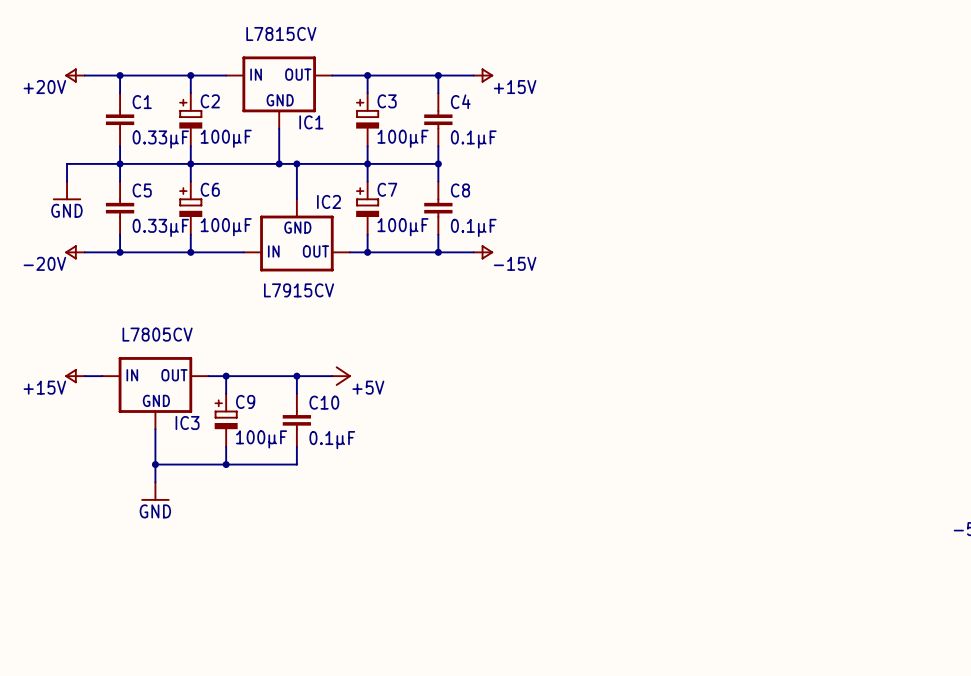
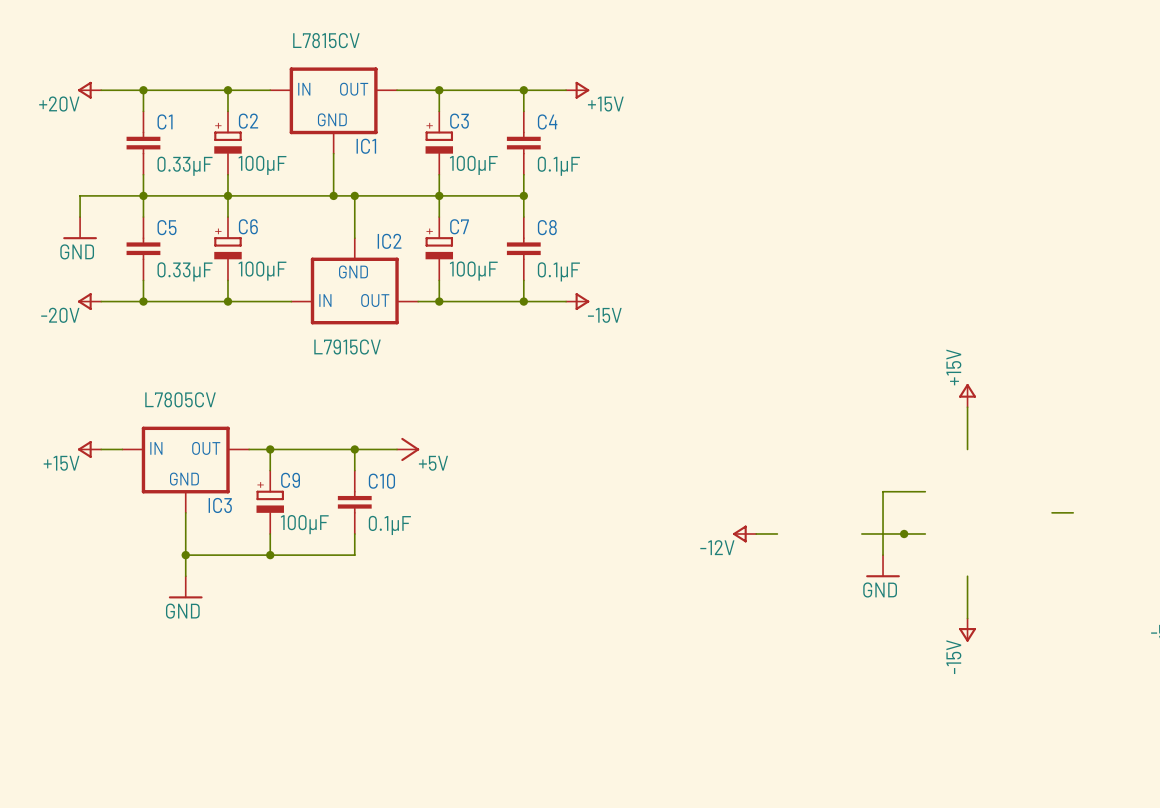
power symbol: none -> +15V (967, 395)
wire: none -> (967, 407) (967, 449)
wire: none -> (925, 491) (883, 491) (883, 555)
wire: none -> (1052, 512) (1073, 512)
power symbol: none -> -12V (744, 533)
wire: none -> (756, 533) (777, 533)
wire: none -> (861, 533) (925, 533)
junction: none -> (904, 533)
power symbol: none -> GND (883, 566)
wire: none -> (967, 576) (967, 618)
power symbol: none -> -15V (967, 630)

